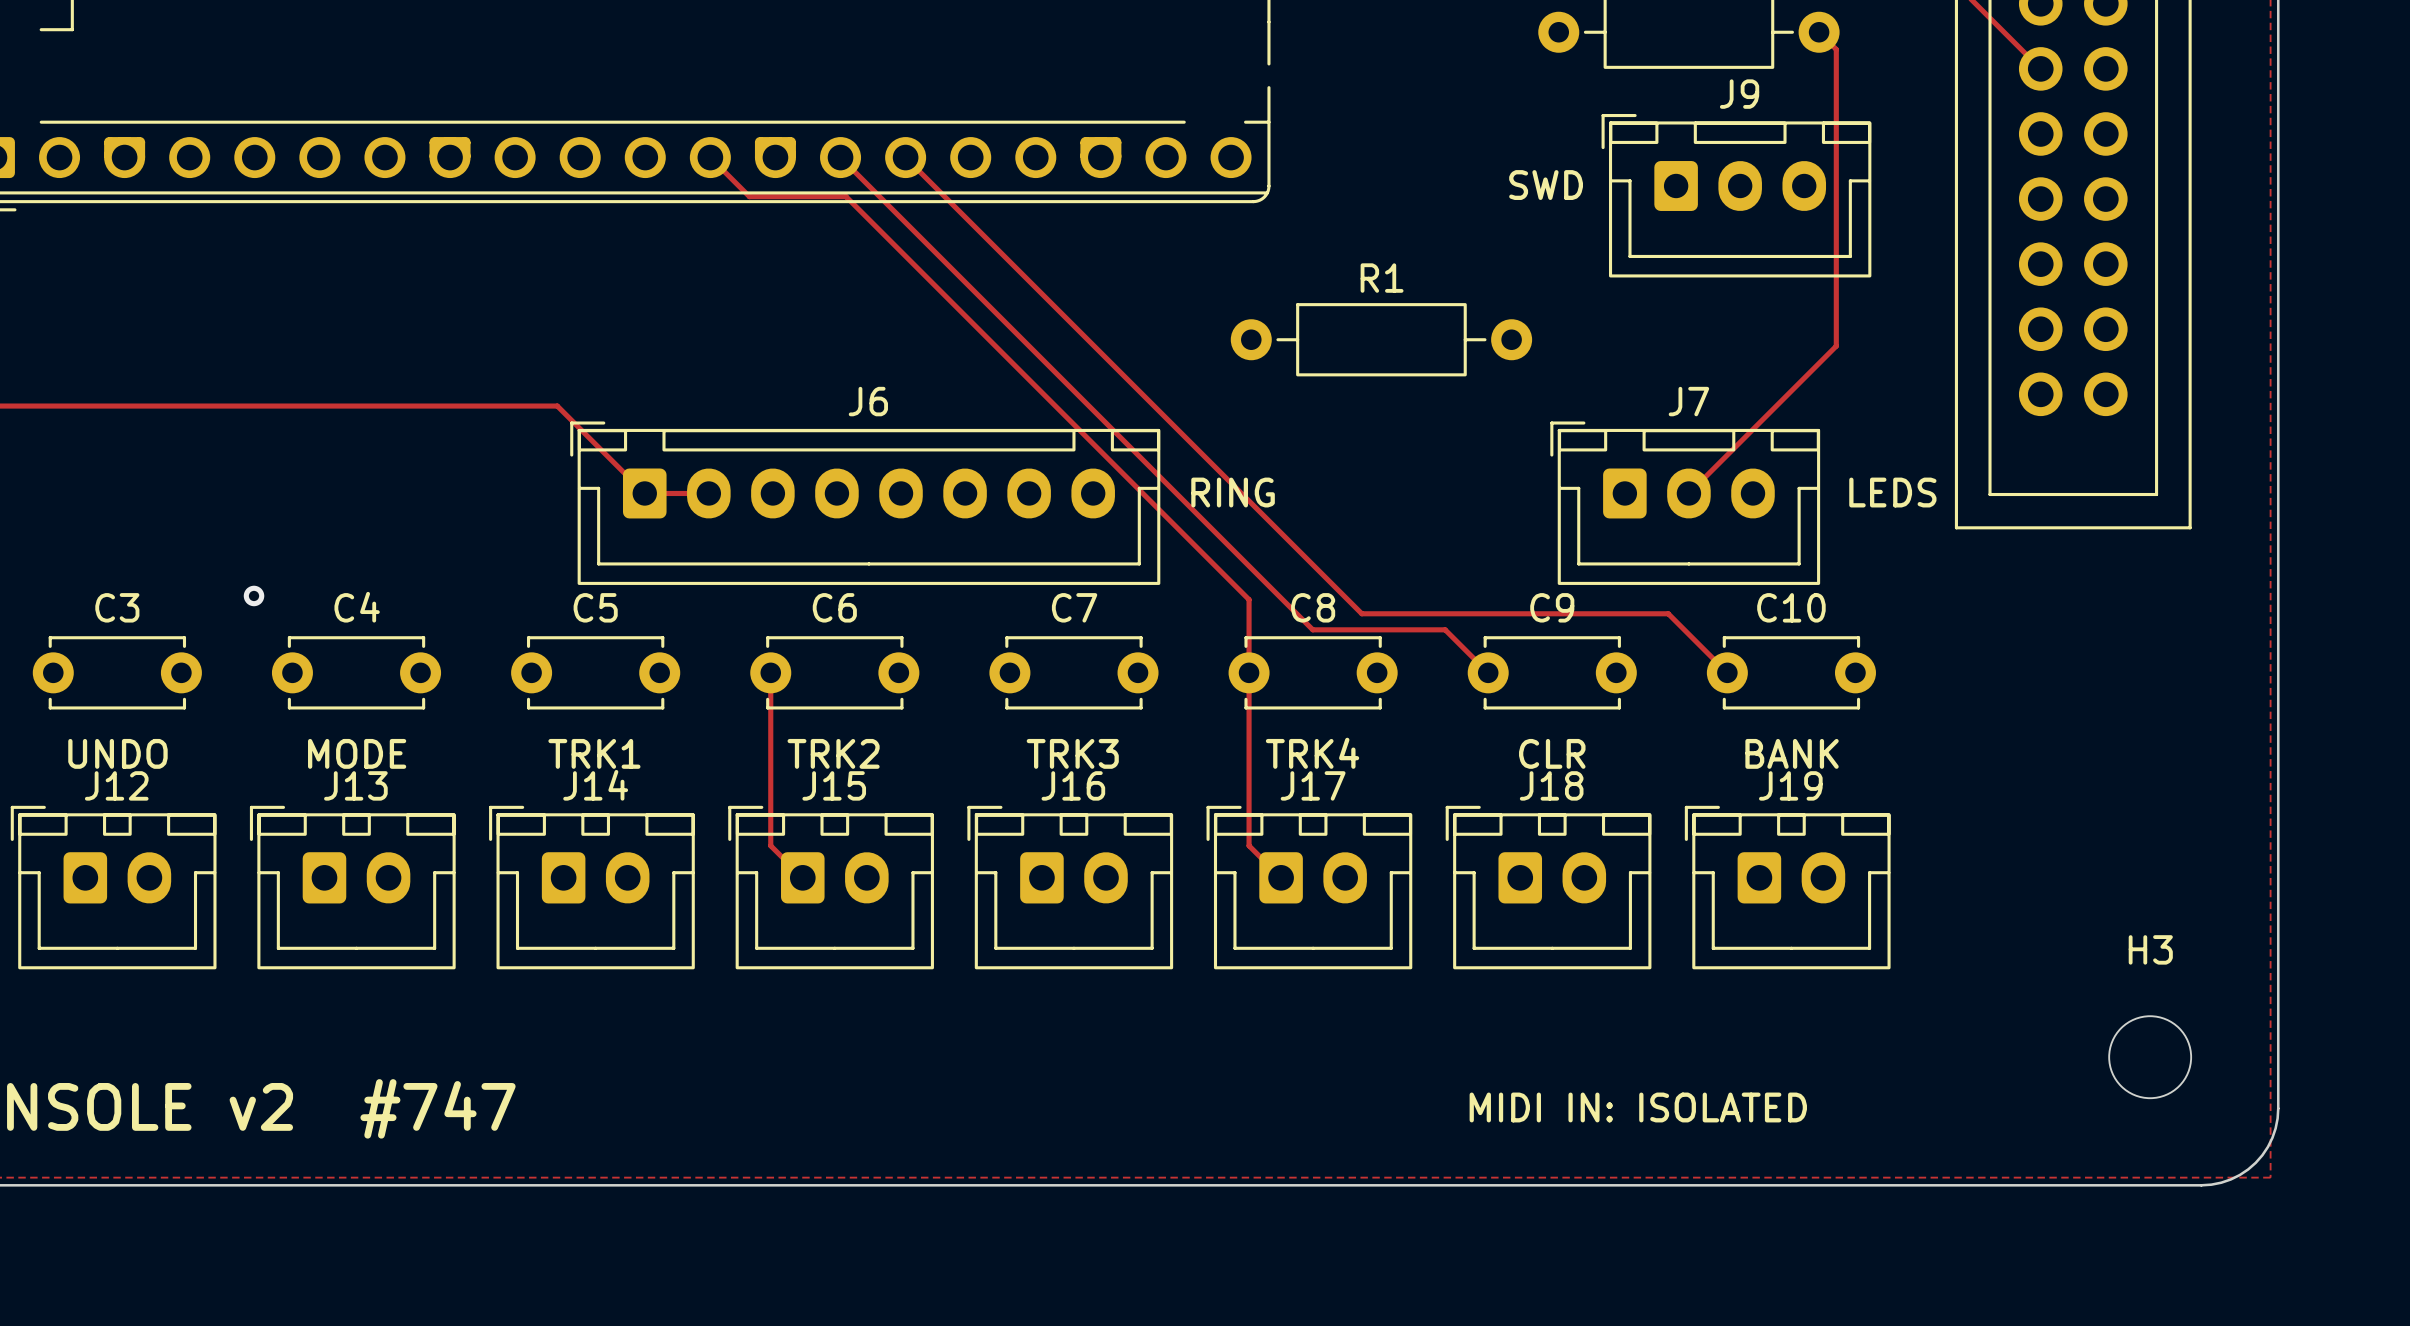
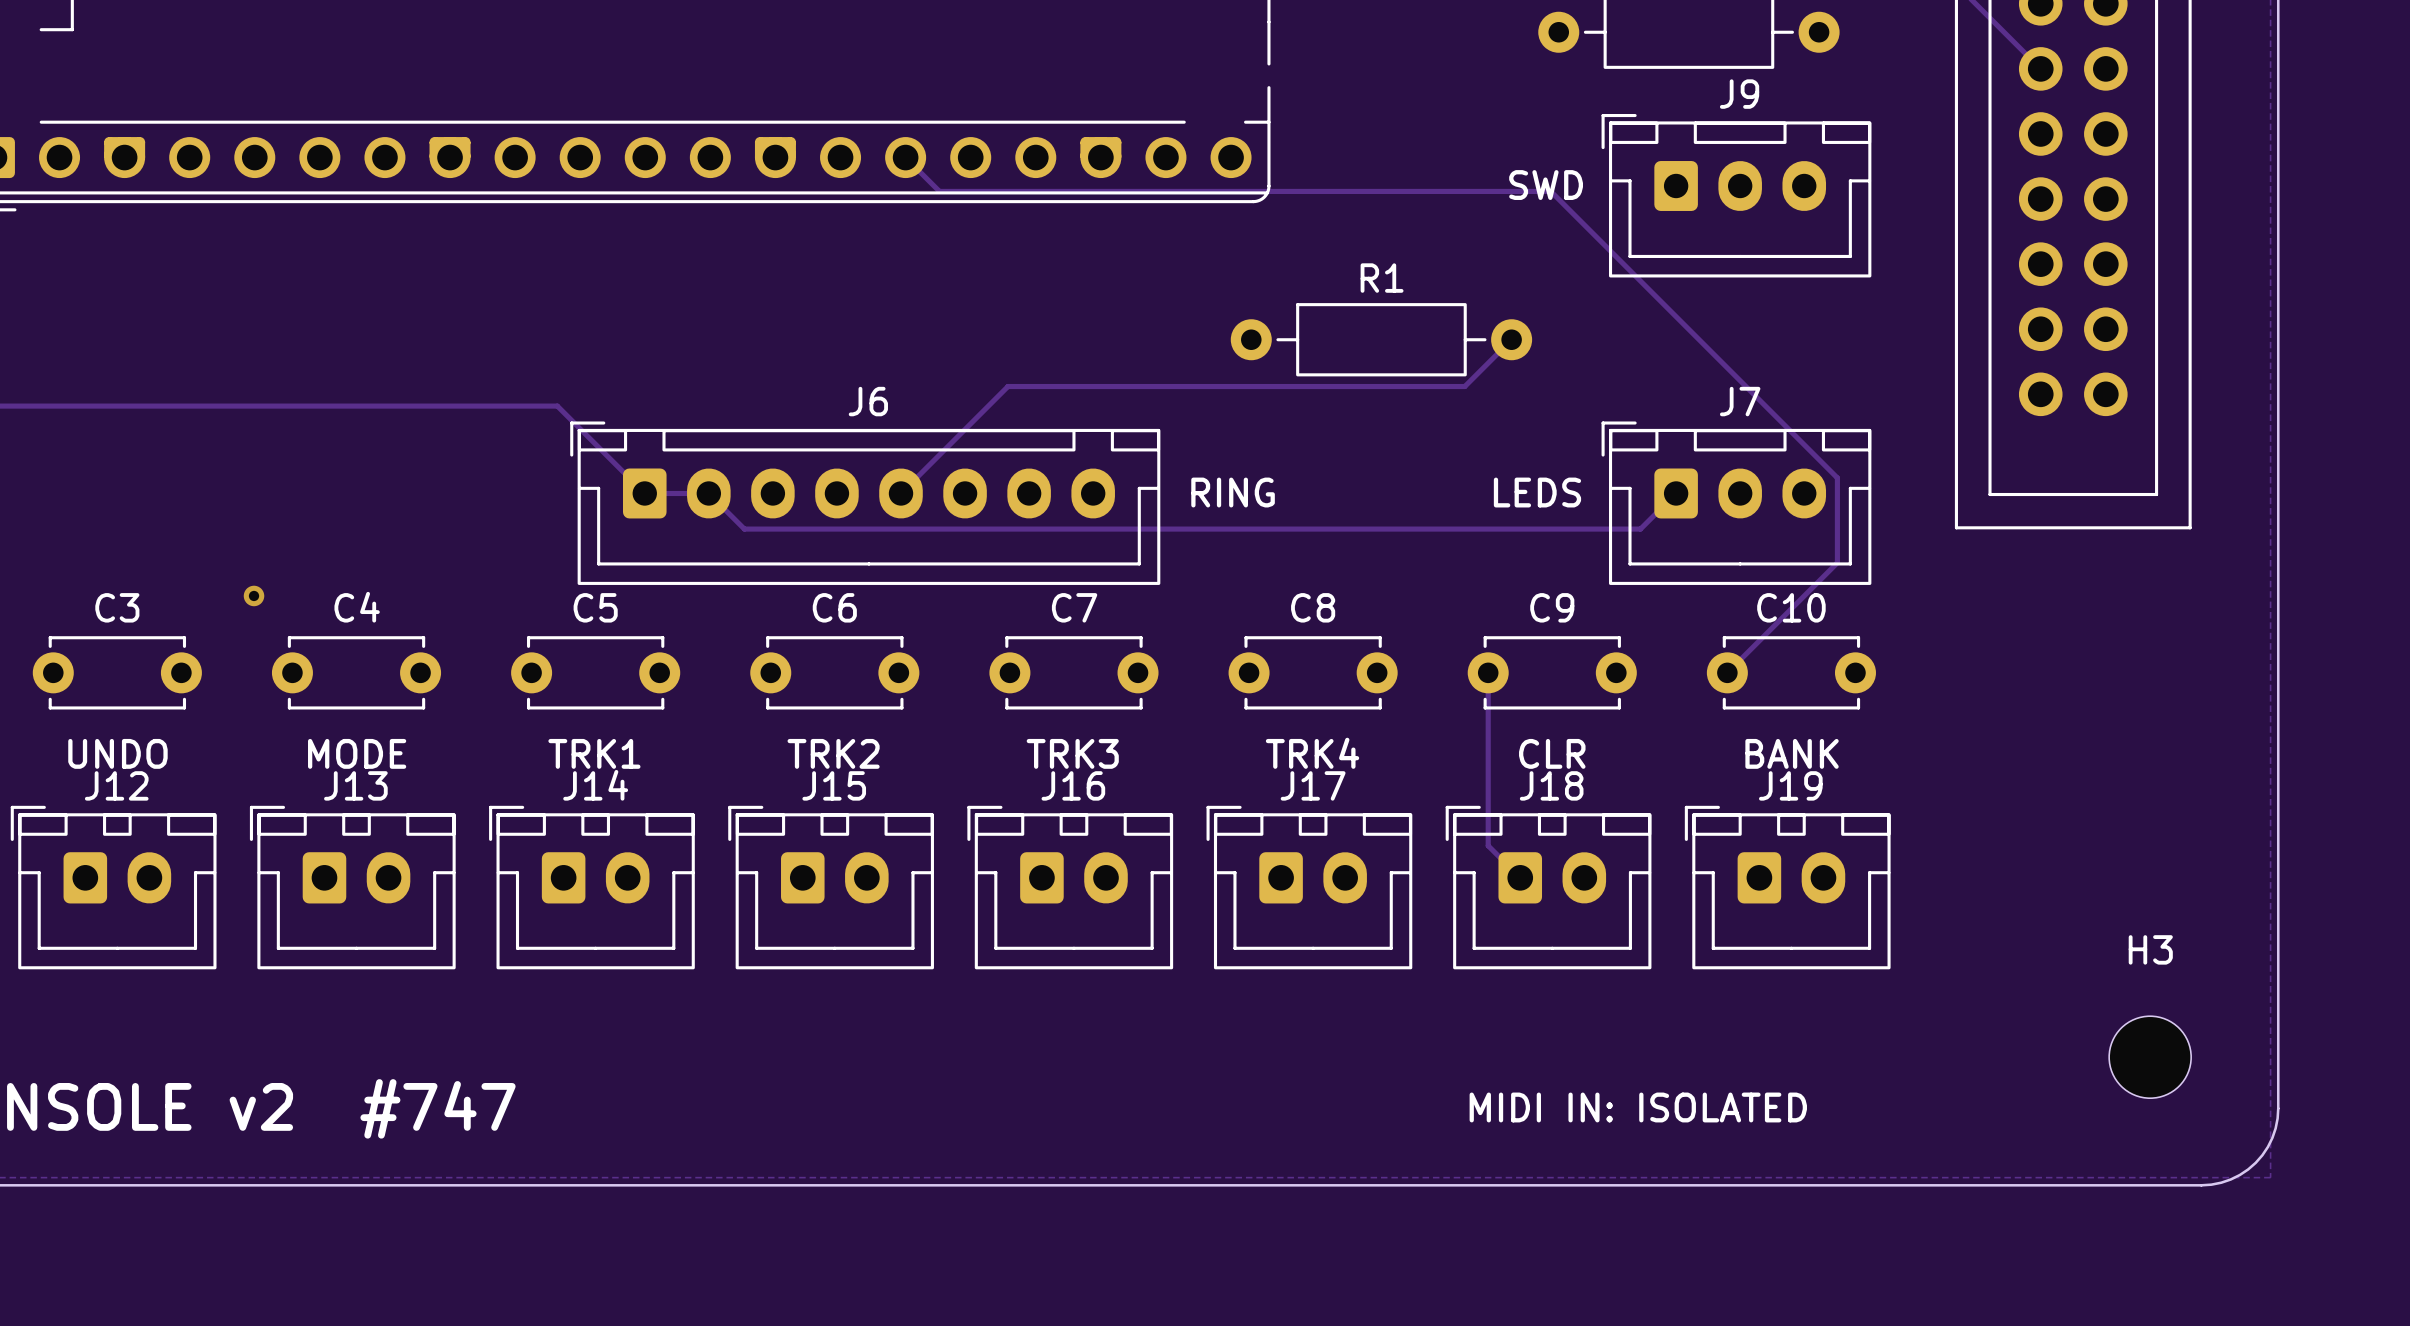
track: (1819, 32) (1836, 49) (1836, 346) (1688, 493) -> none
track: (710, 157) (749, 196) (846, 196) (1249, 599) (1249, 845) (1281, 877) -> none
track: (840, 157) (1312, 629) (1445, 629) (1488, 672) -> (1520, 877) (1488, 845) (1488, 672)
track: (939, 191) (1361, 613) (1668, 613) (1727, 672) -> (939, 191) (1550, 191) (1837, 477) (1837, 562) (1727, 672)
track: none -> (1511, 339) (1464, 386) (1007, 386) (901, 493)
text position: LEDS (1892, 492) -> LEDS (1537, 492)
track: none -> (708, 493) (744, 529) (1640, 529) (1676, 493)
J7 position: (1685, 503) -> (1736, 503)
track: (770, 672) (770, 845) (802, 877) -> none

